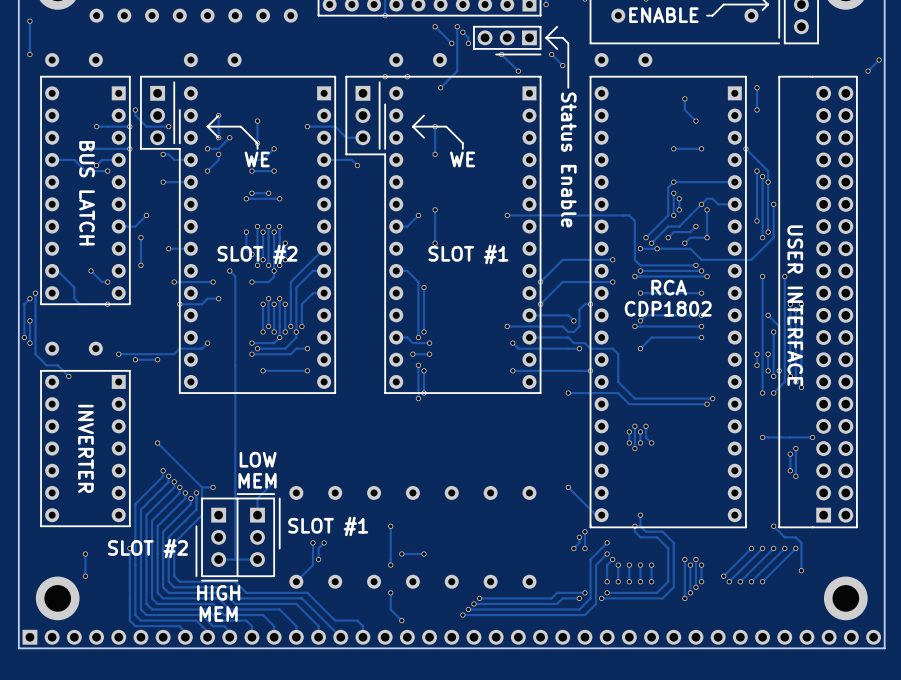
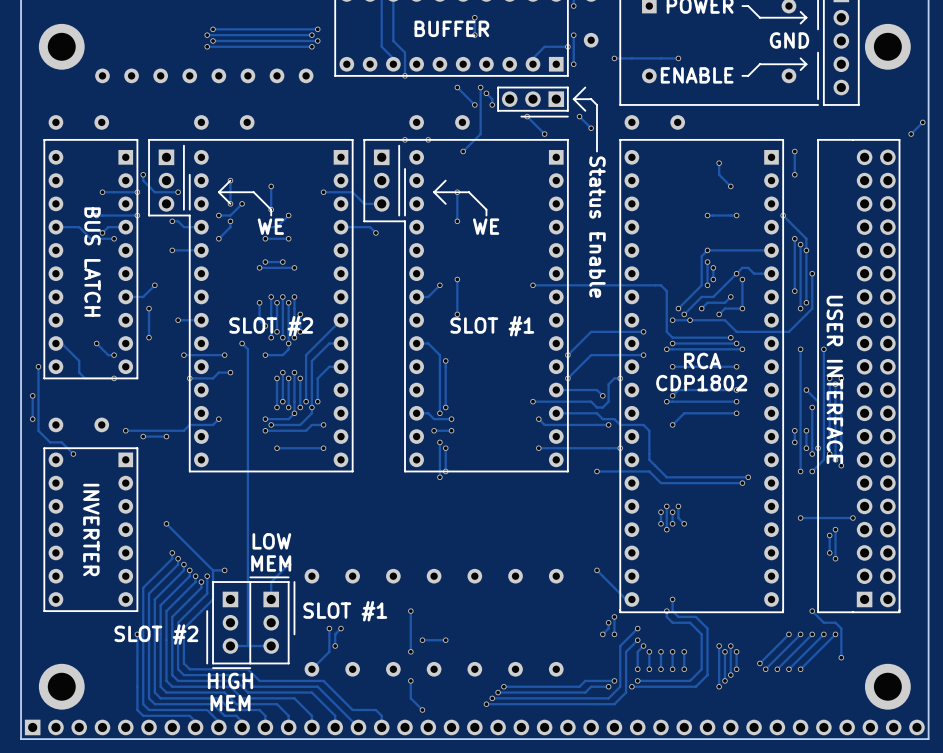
track: (29, 21) (29, 54) -> none
via: (29, 21) -> none
via: (29, 54) -> none
track: (29, 298) (24, 304) (24, 337) -> none
via: (29, 298) -> none
via: (24, 337) -> none
track: (85, 554) (85, 576) -> none
via: (85, 554) -> none
via: (85, 576) -> none

